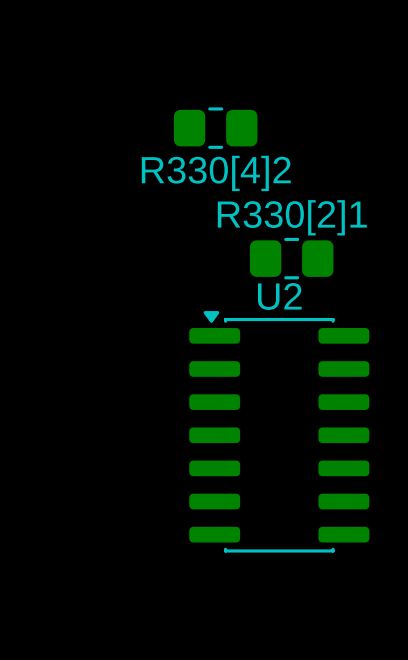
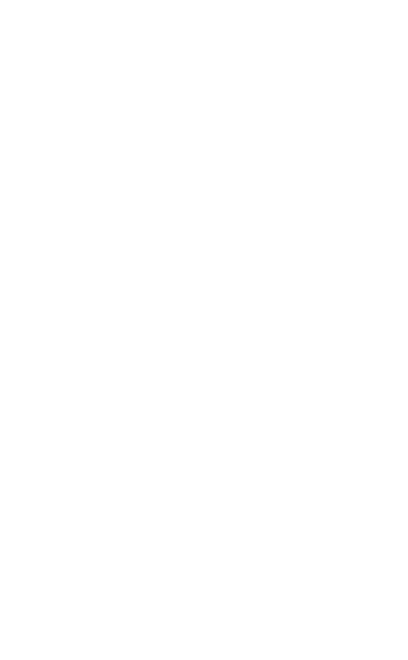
R330[4]2: (215, 128) -> none
R330[2]1: (291, 258) -> none
U2: (279, 431) -> none

